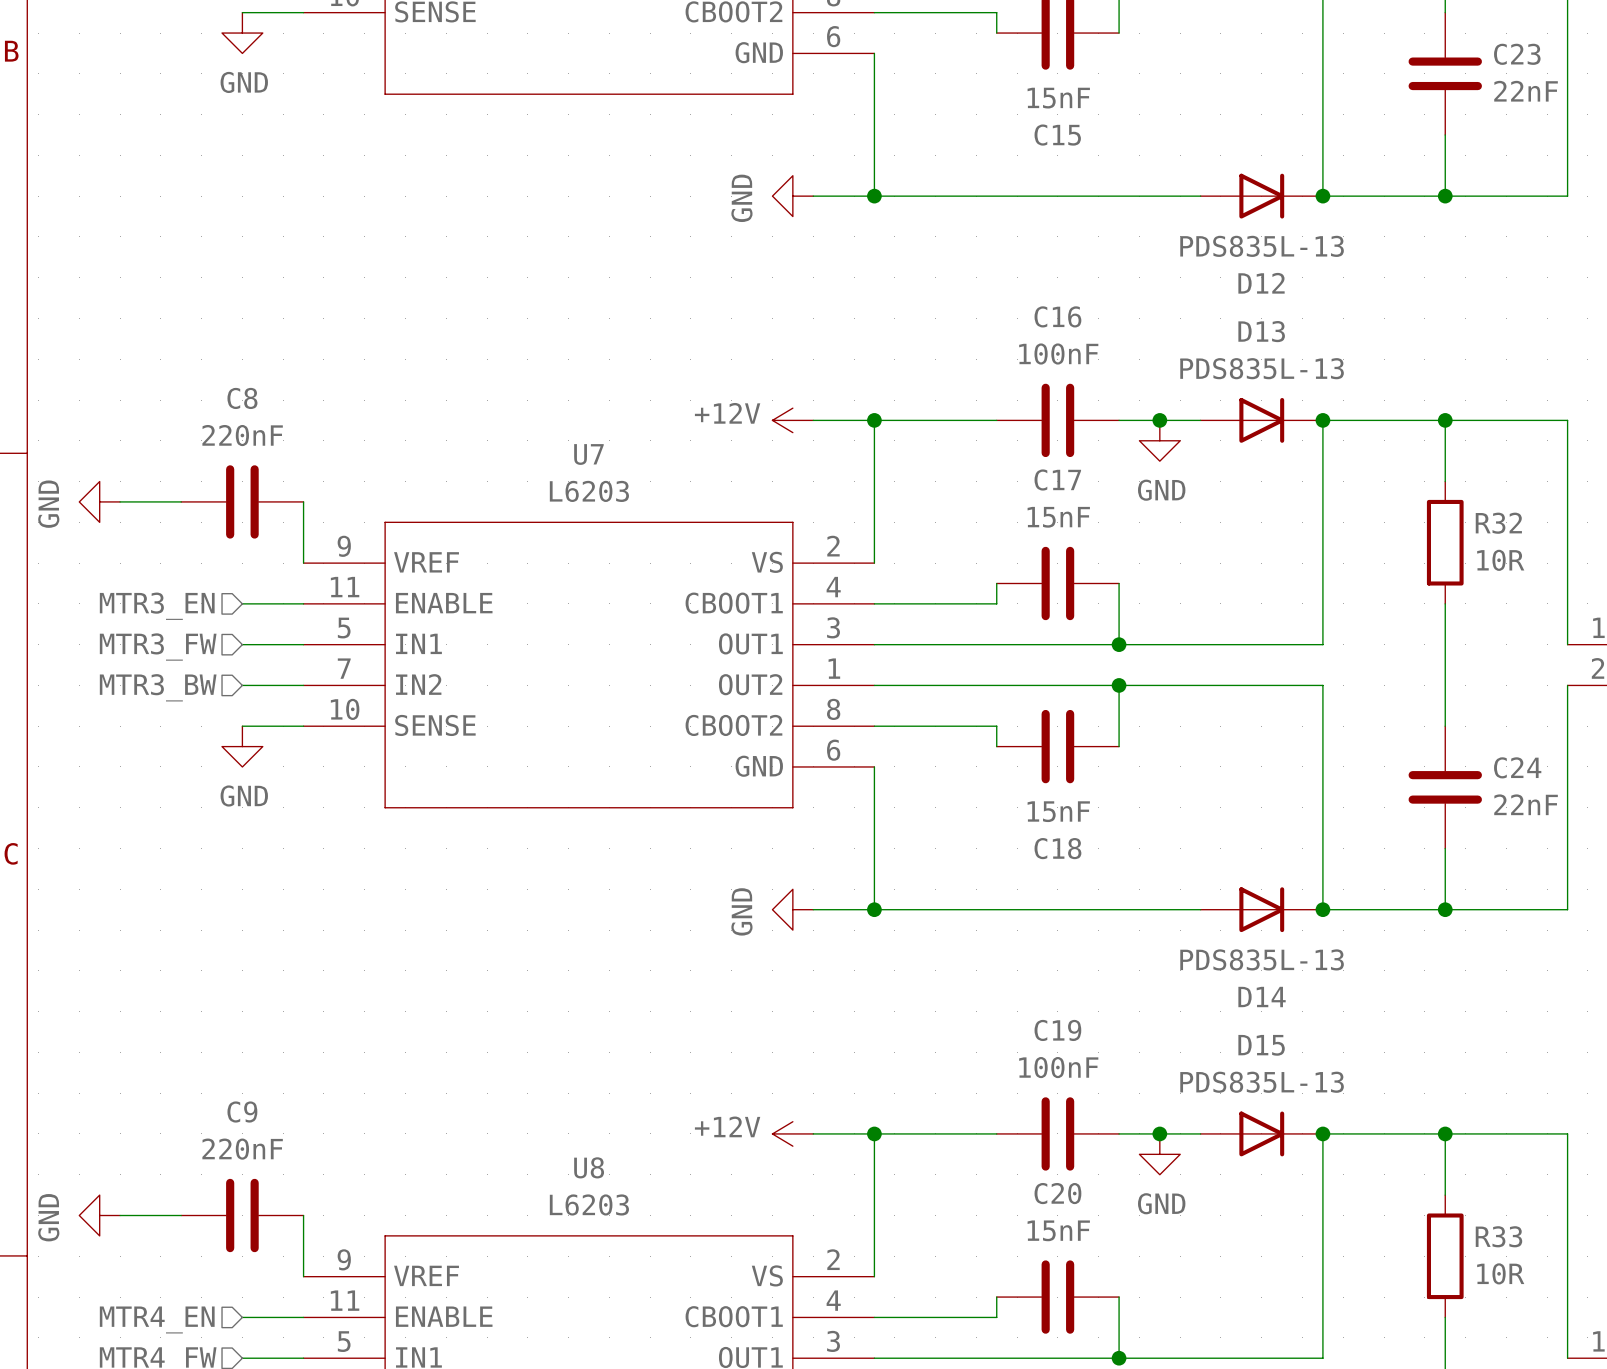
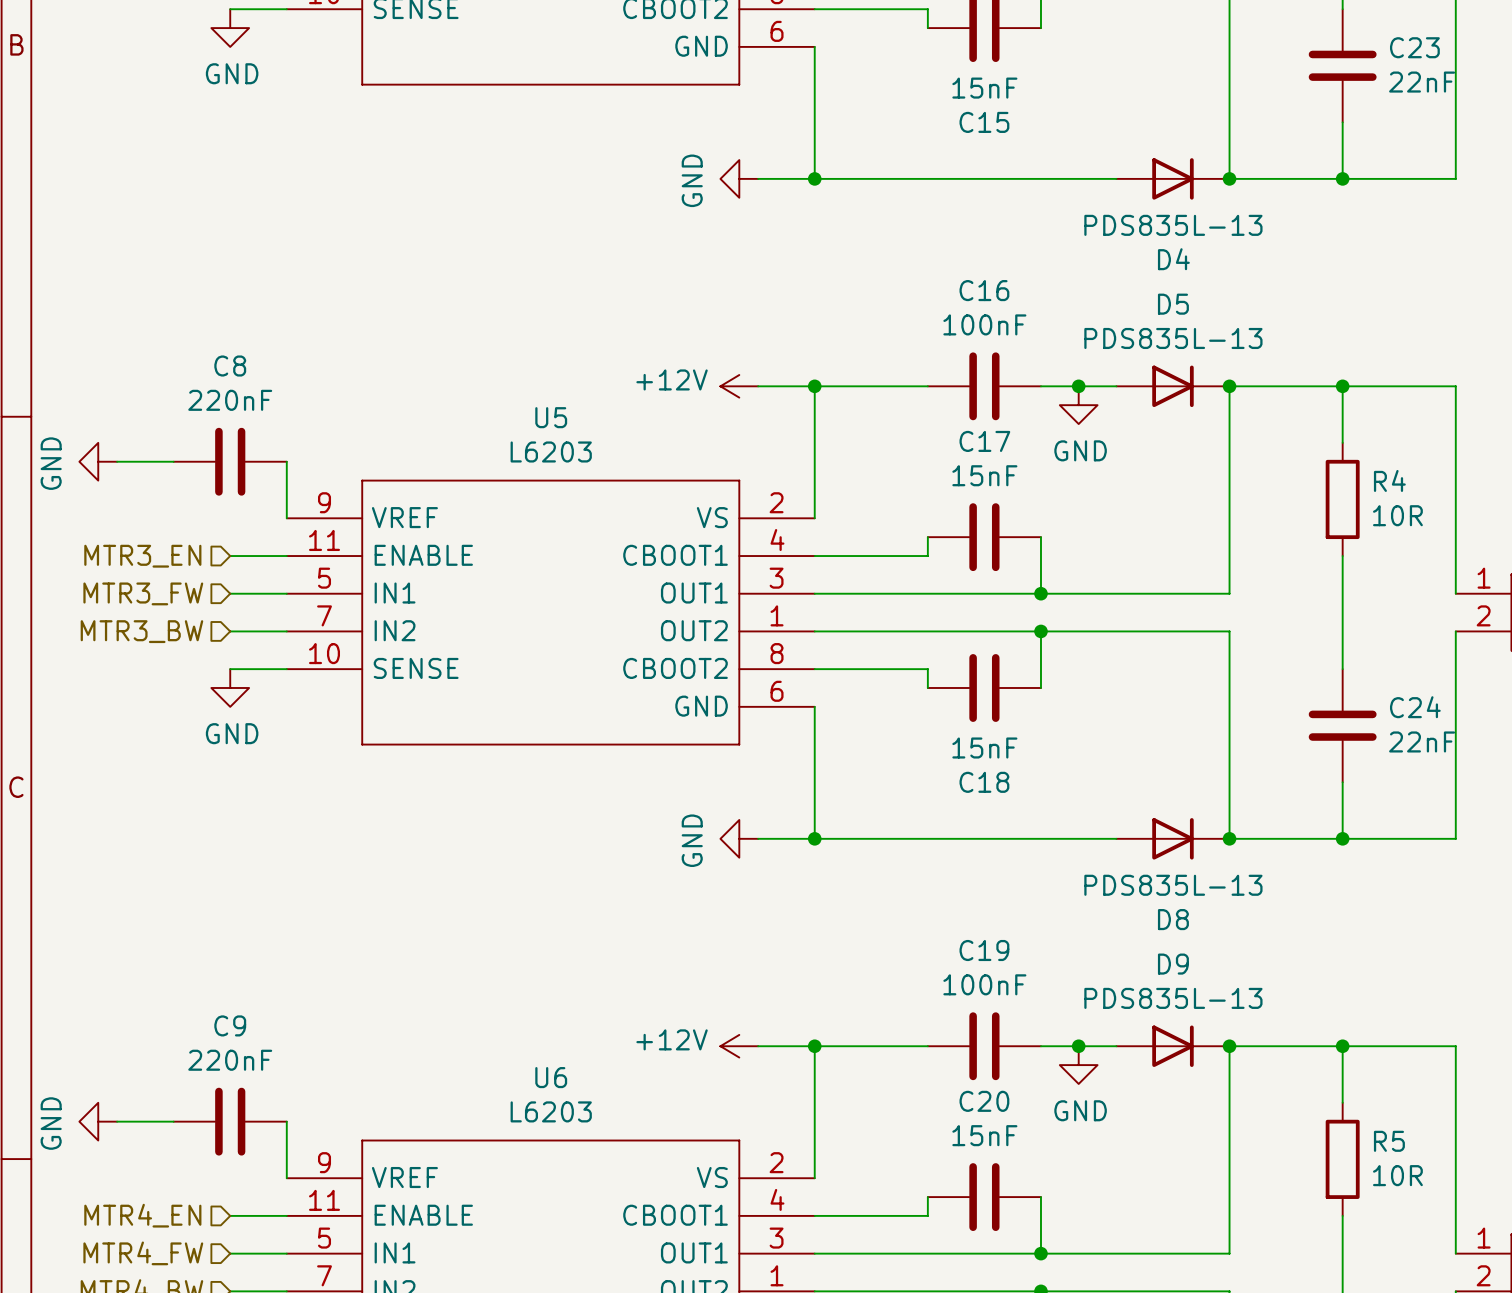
D12 name: D12 (1261, 283) -> D4 (1173, 259)
D13 name: D13 (1261, 331) -> D5 (1173, 304)
U7 name: U7 (588, 454) -> U5 (551, 417)
R32 name: R32 (1498, 523) -> R4 (1389, 480)
D14 name: D14 (1262, 997) -> D8 (1173, 919)
D15 name: D15 (1261, 1045) -> D9 (1173, 964)
U8 name: U8 (589, 1167) -> U6 (551, 1077)
R33 name: R33 (1498, 1236) -> R5 (1389, 1141)

